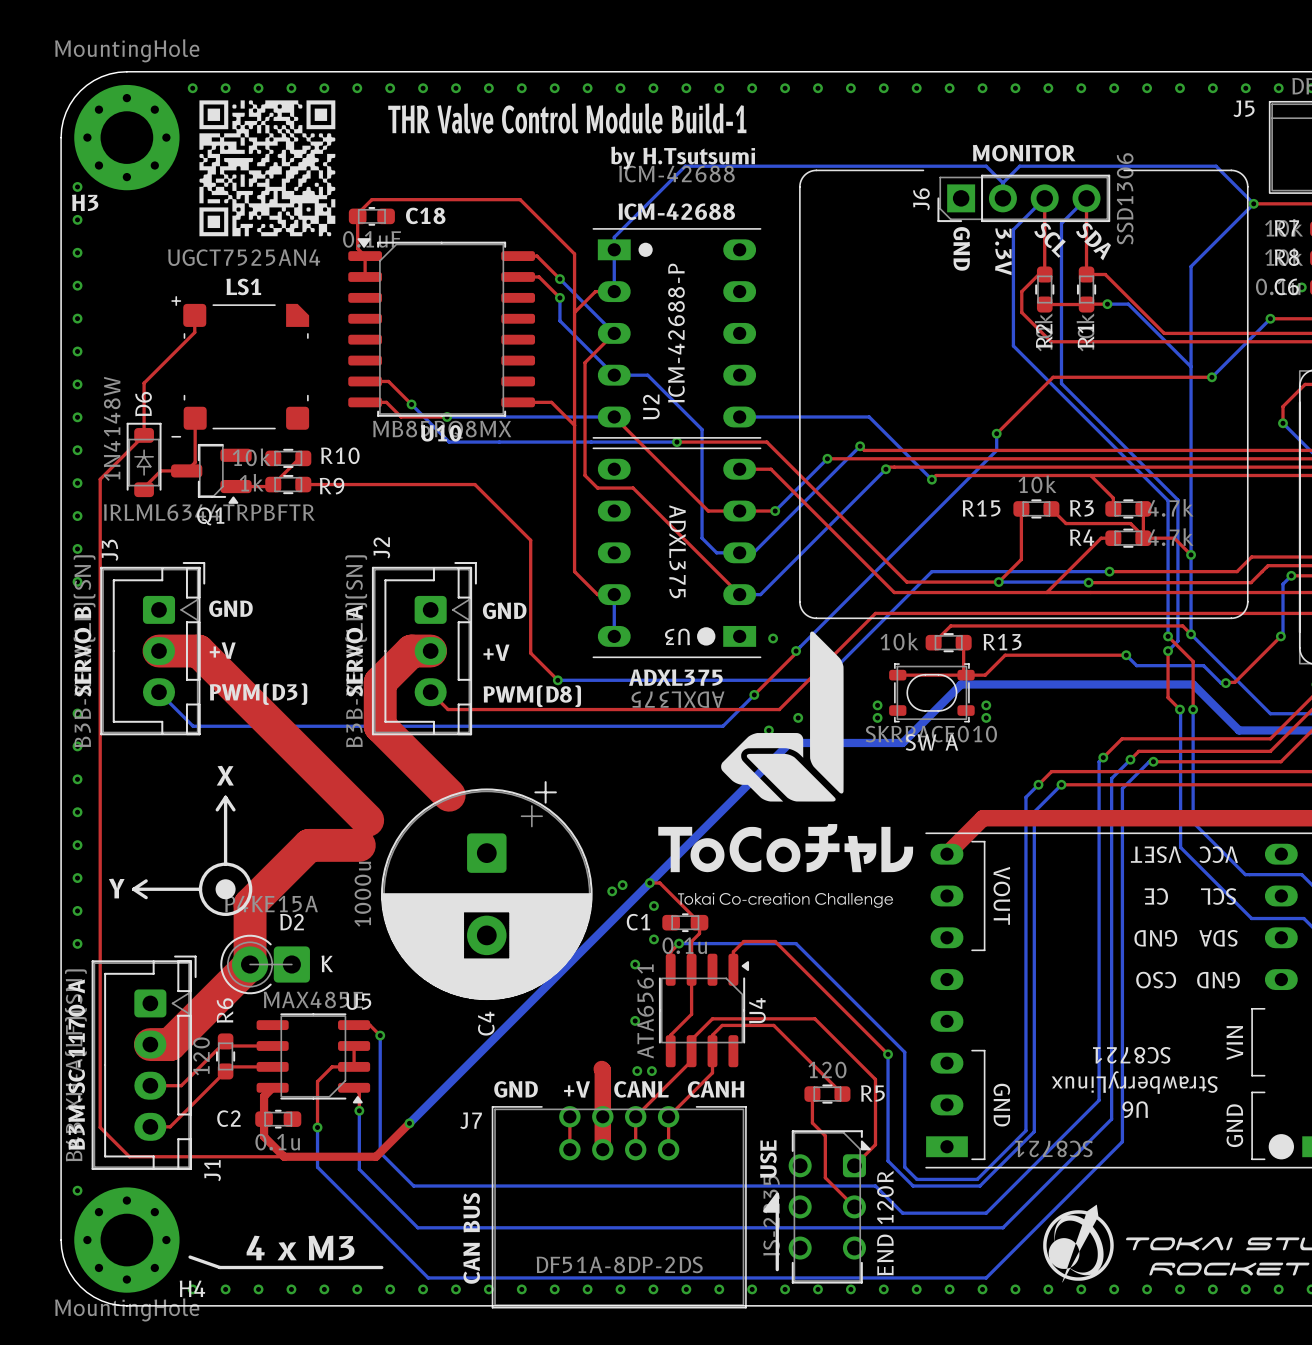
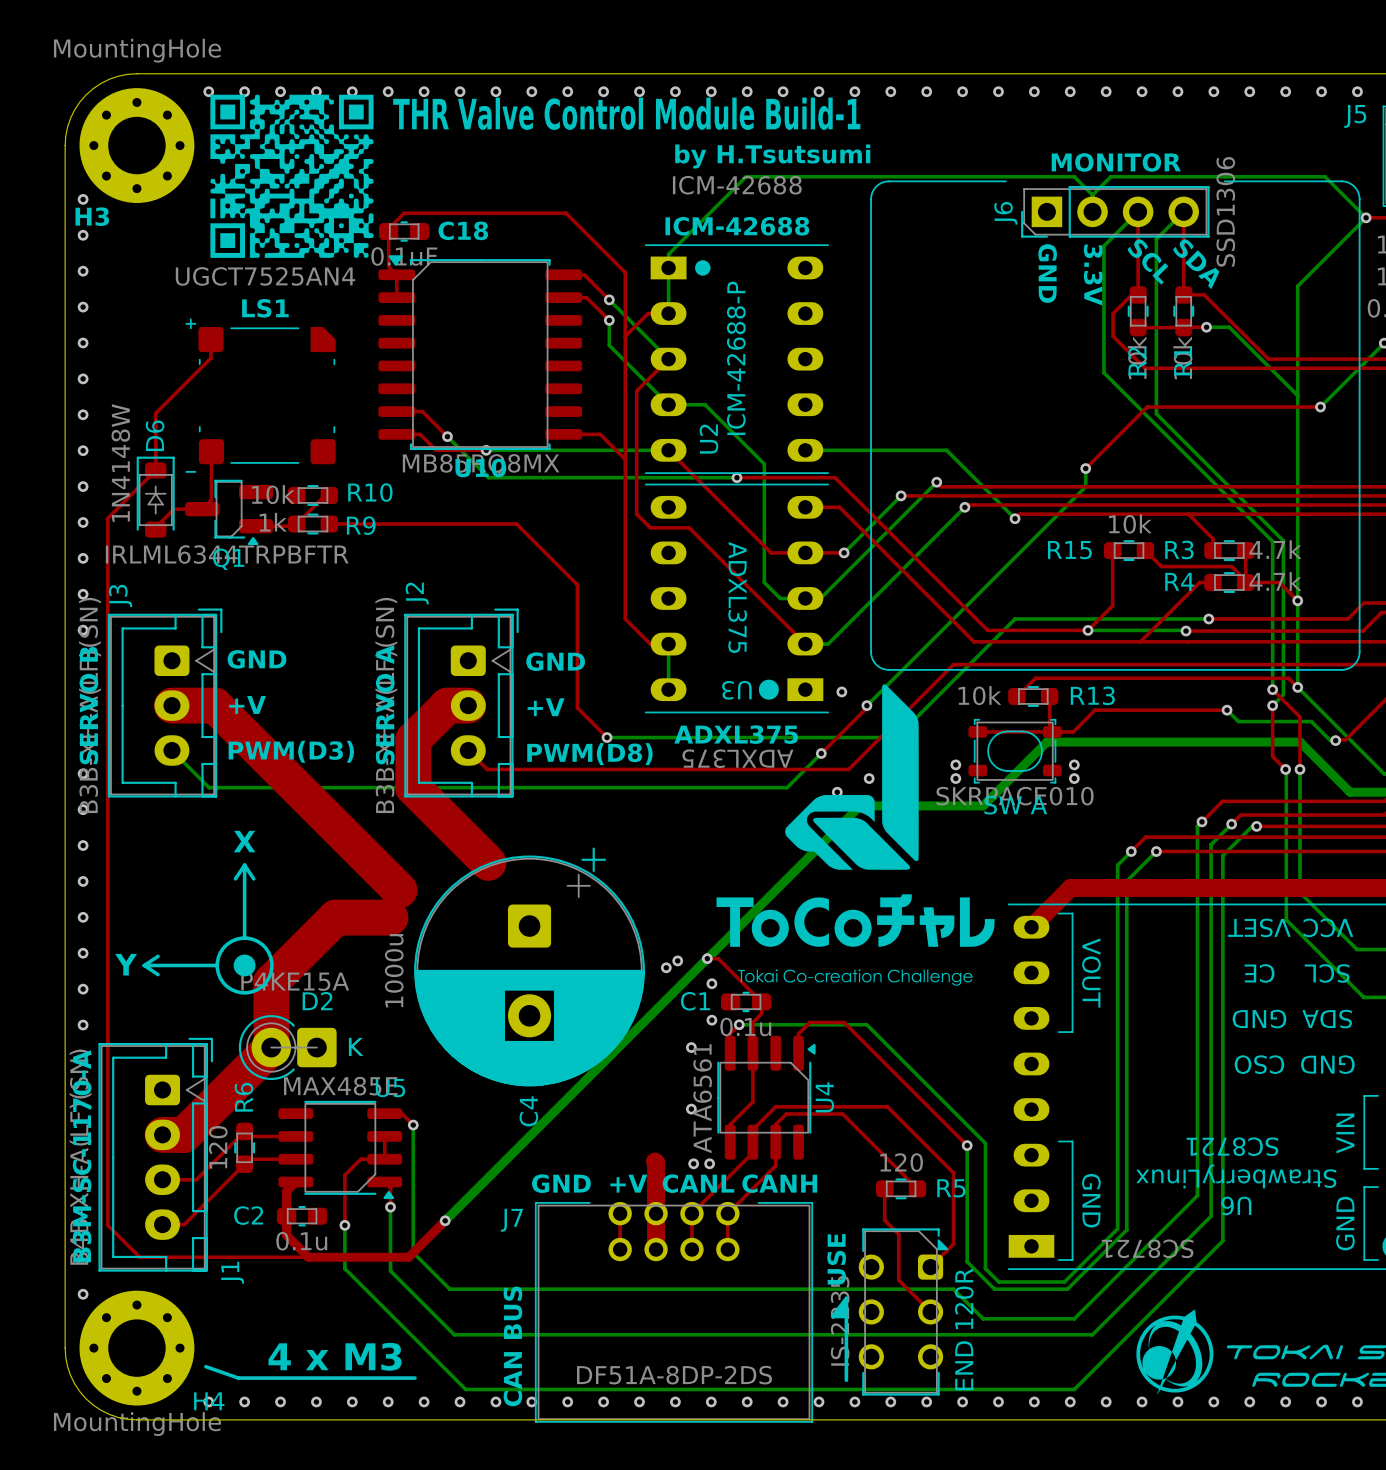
drawing shape: [199, 100, 336, 237] -> [210, 94, 374, 258]
text position: THR Valve Control Module Build-1 (567, 118) -> THR Valve Control Module Build-1 (626, 113)
text position: by H.Tsutsumi (683, 158) -> by H.Tsutsumi (772, 156)

